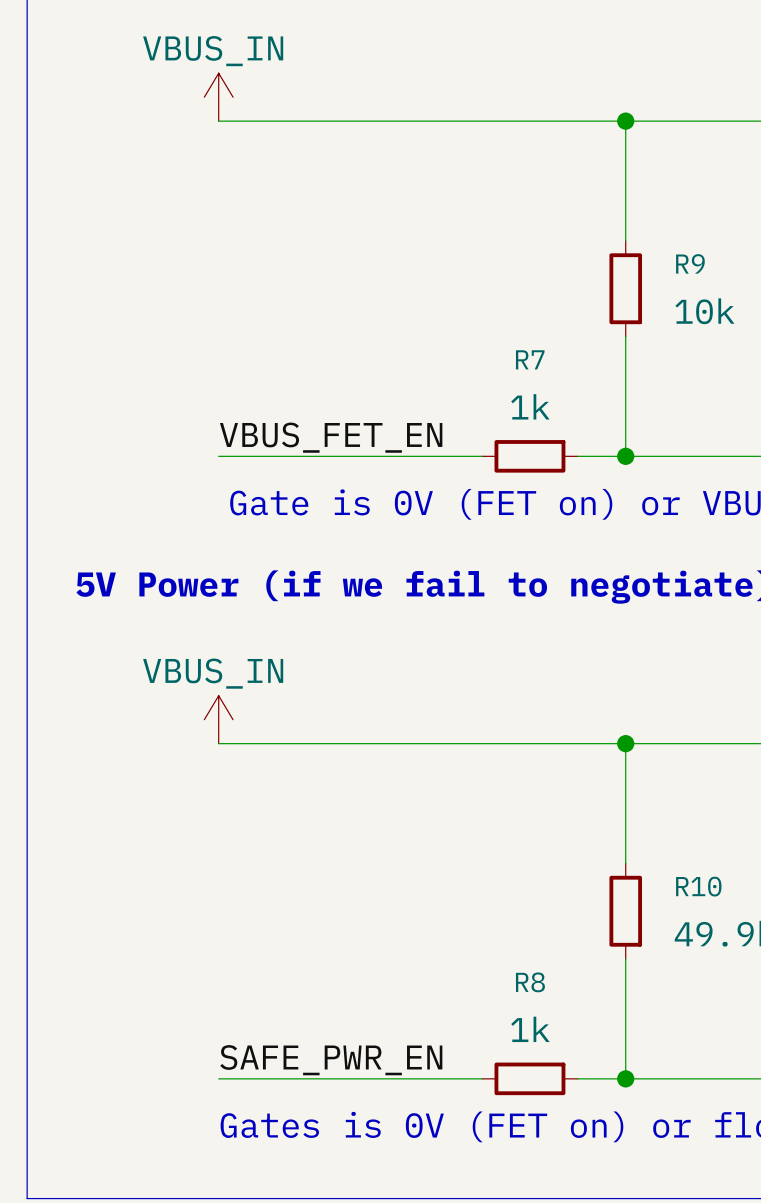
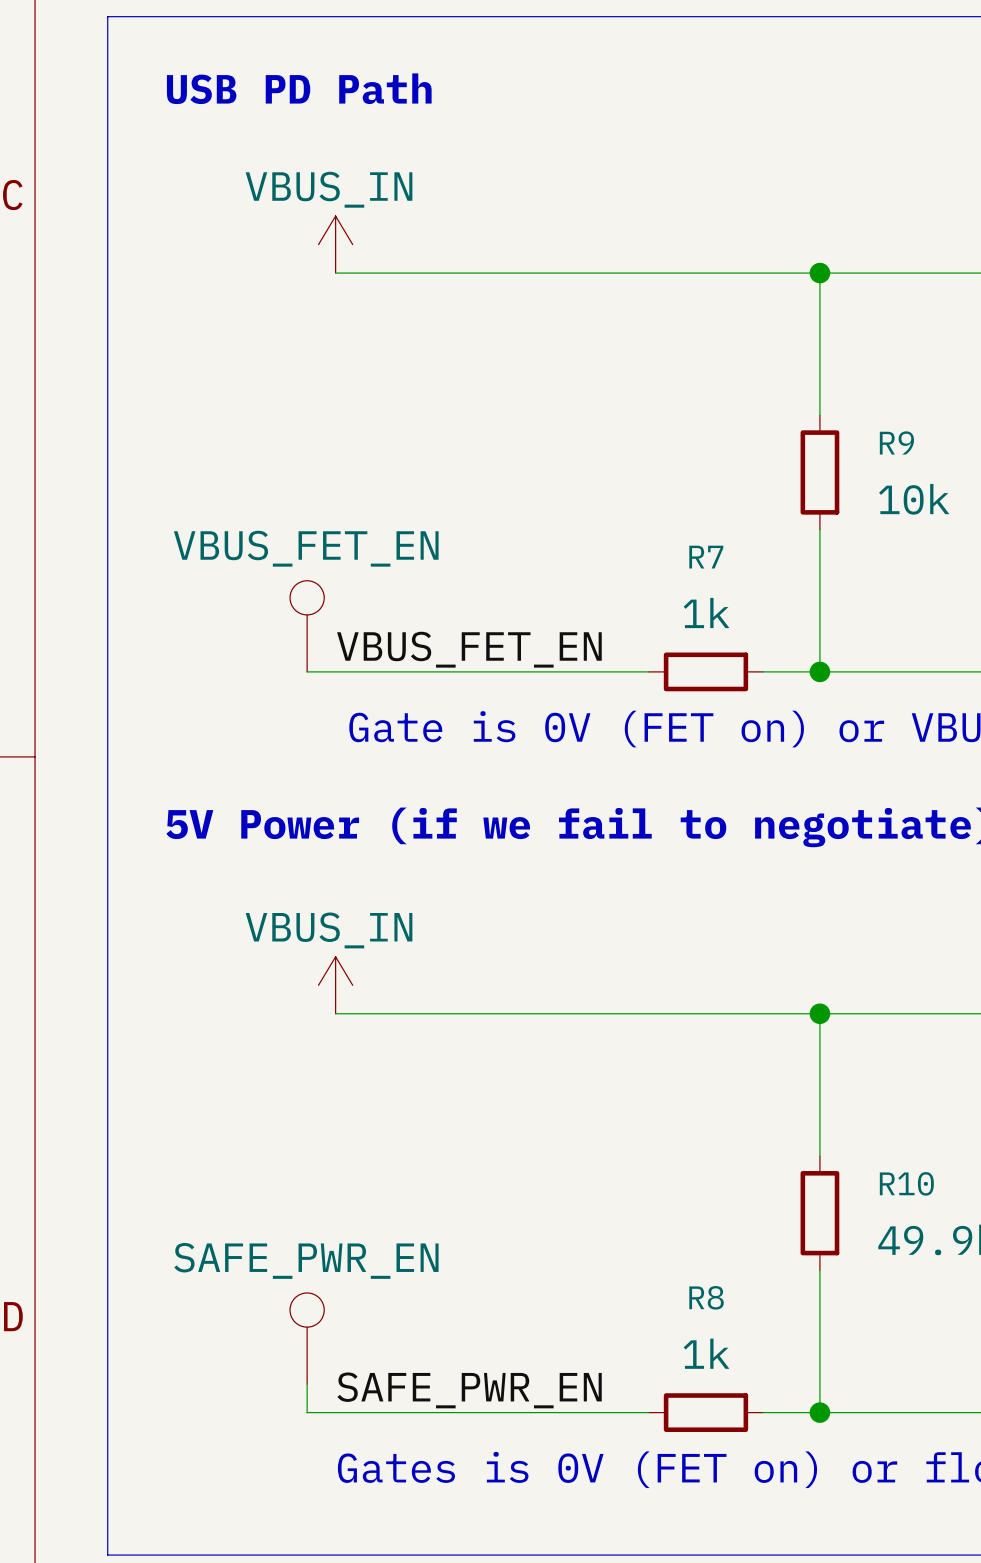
part: none -> VBUS_FET_EN (307, 626)
wire: none -> (307, 671) (335, 671)
part: none -> SAFE_PWR_EN (307, 1338)
wire: none -> (307, 1384) (307, 1412) (335, 1412)

